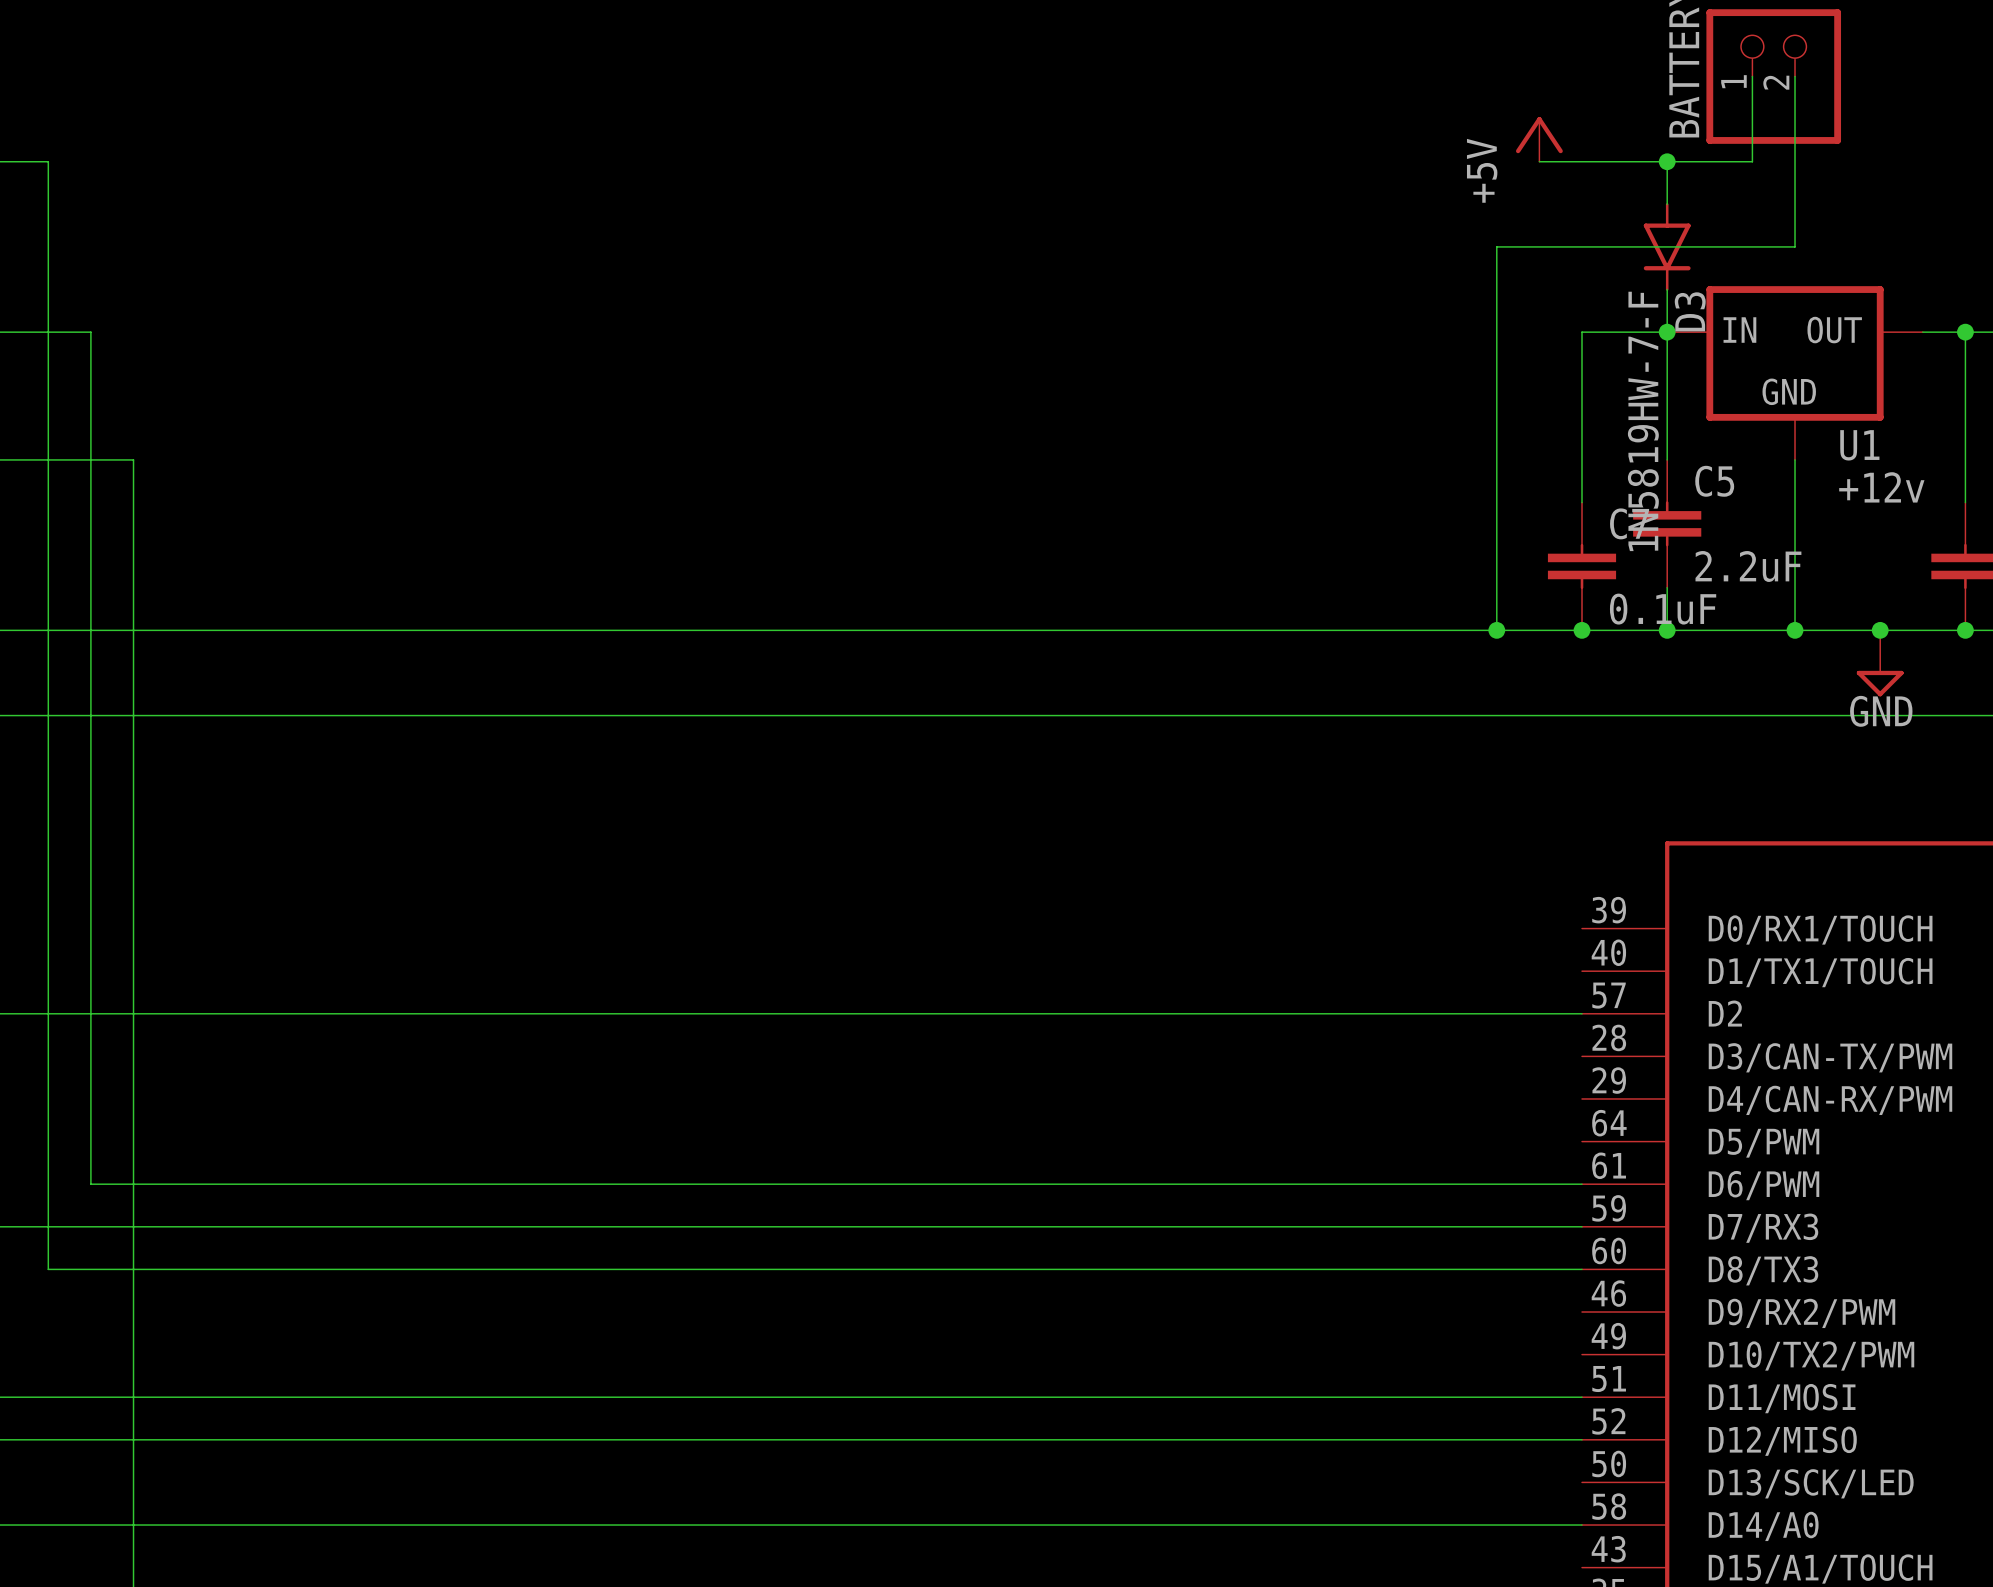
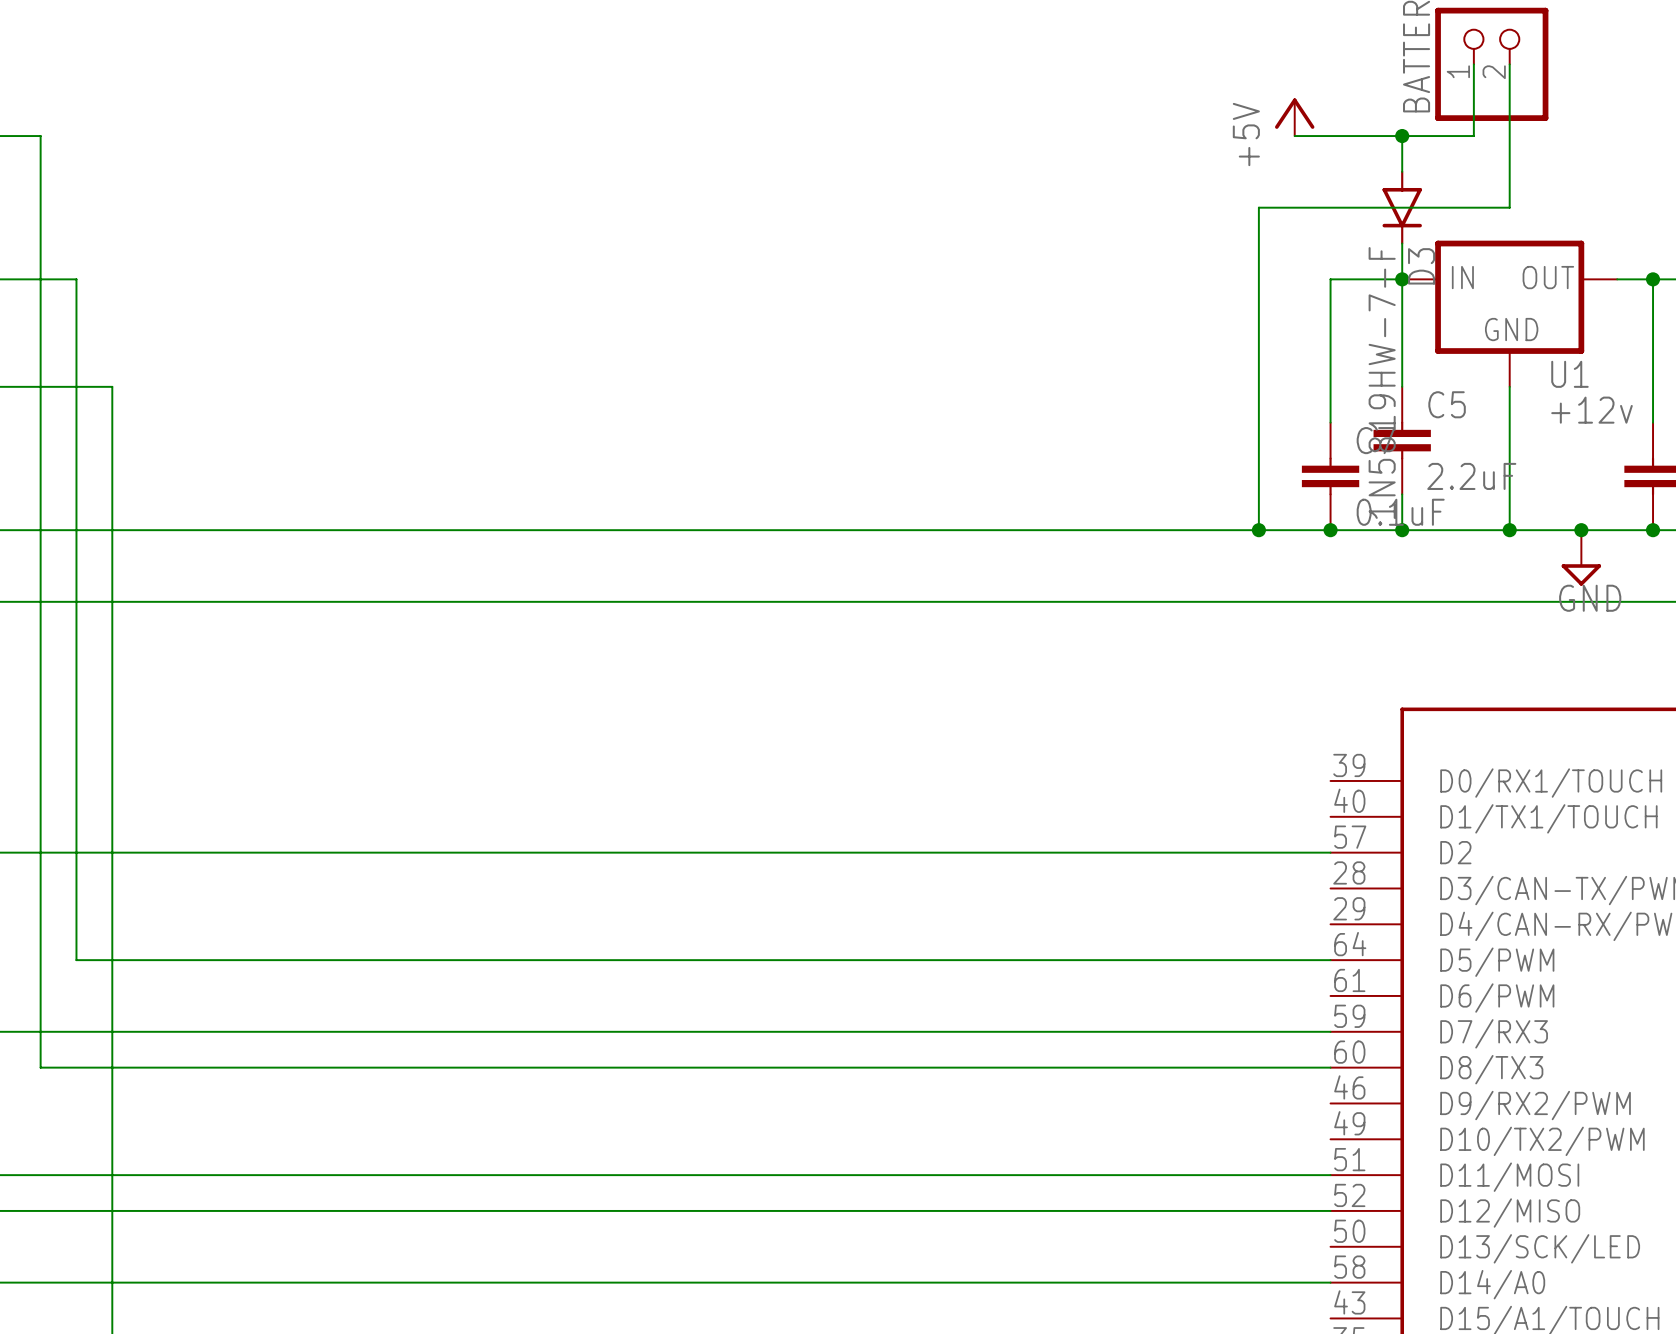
wire: (90, 1141) (90, 1184) (1582, 1184) -> (76, 960) (1330, 960)

